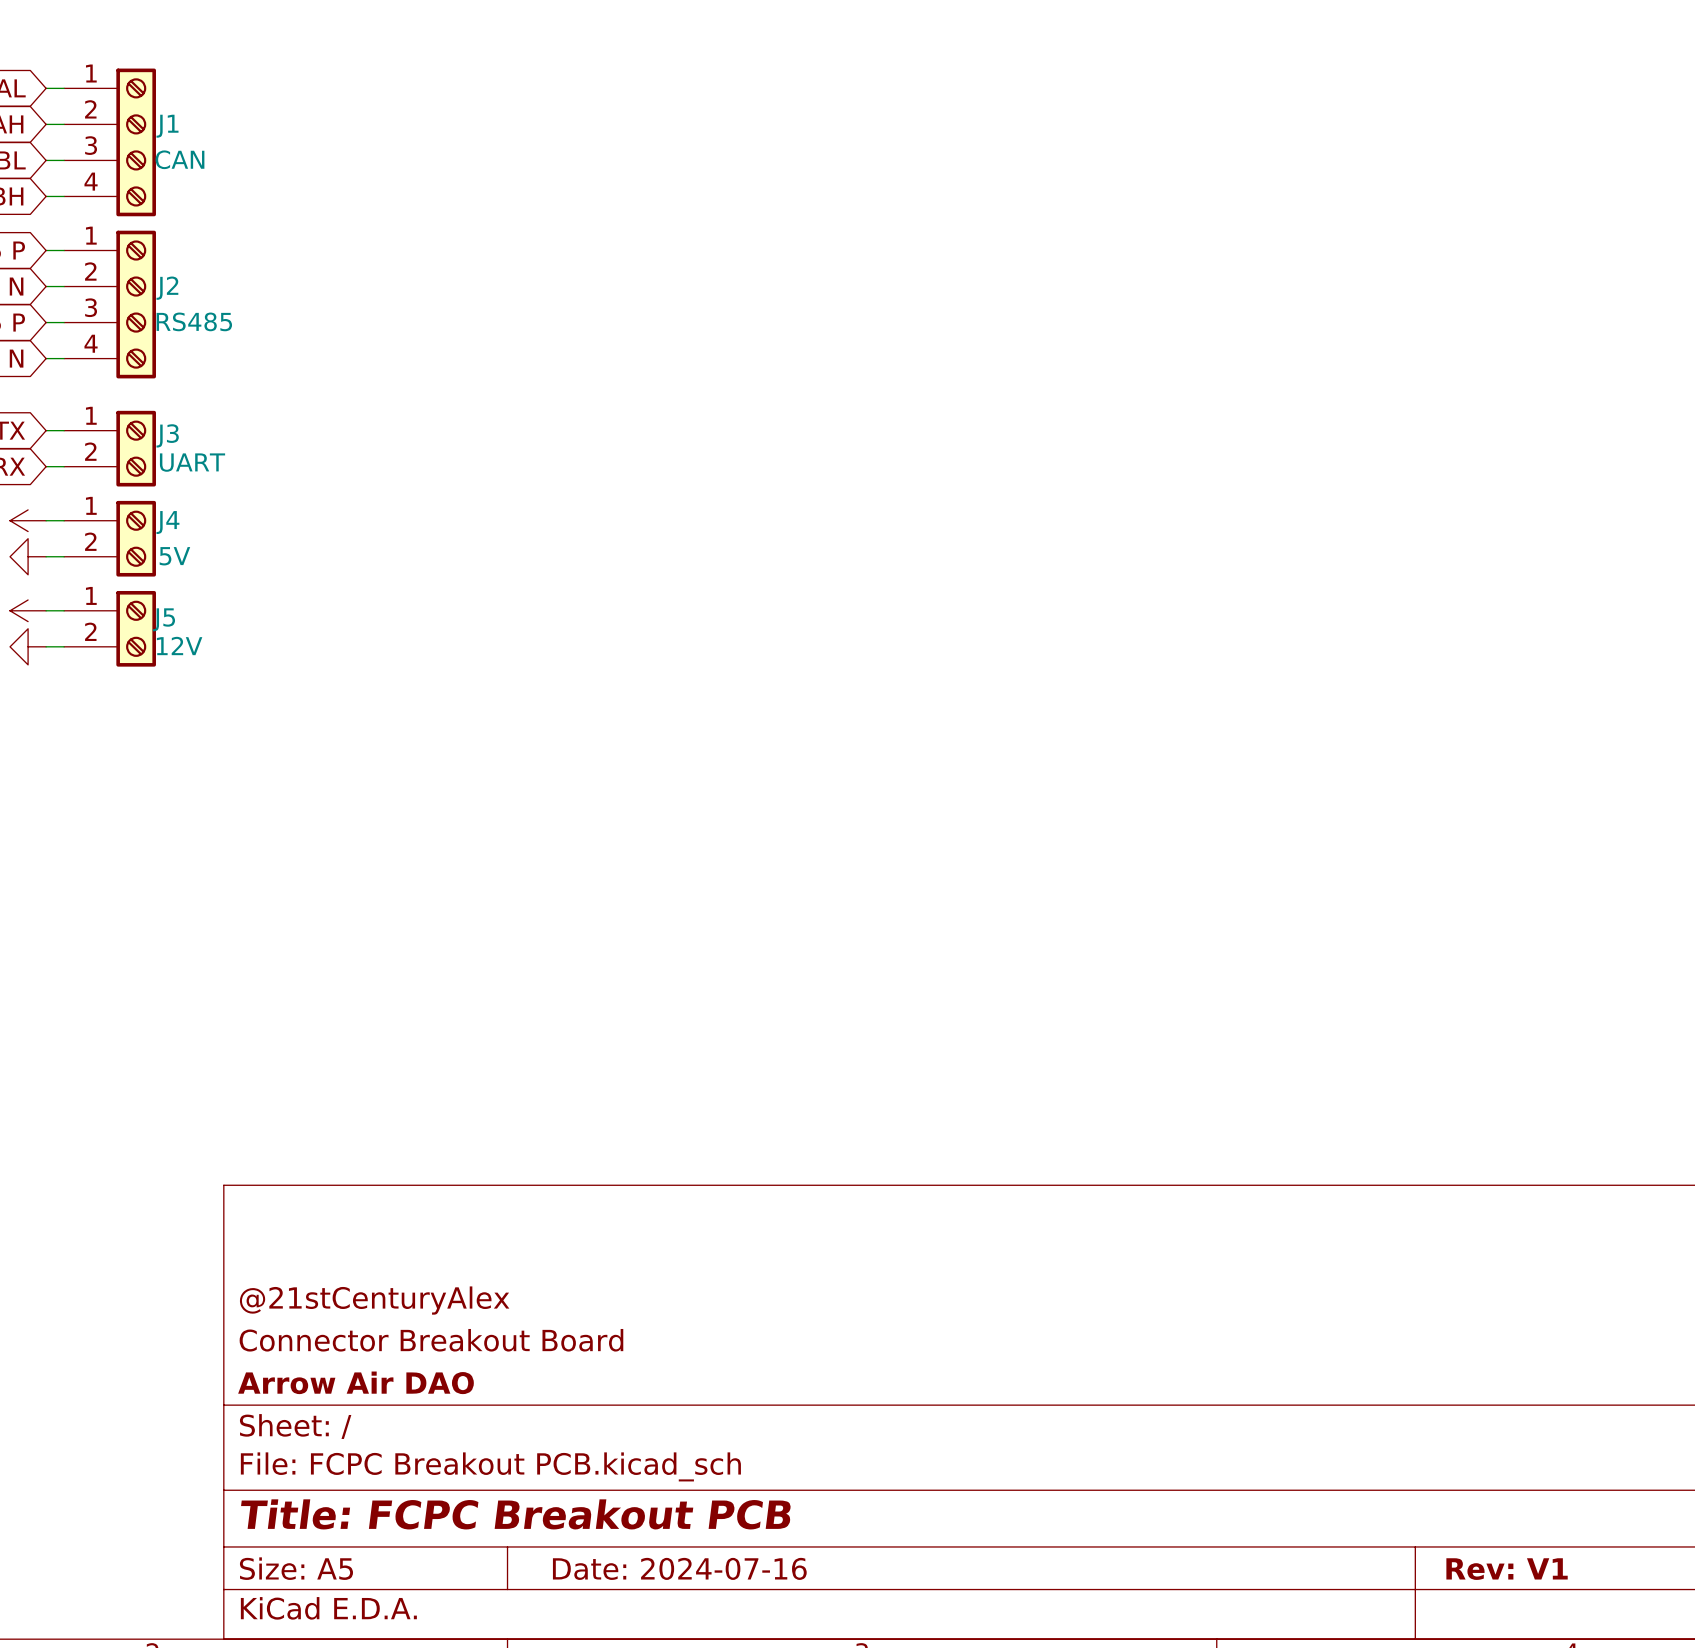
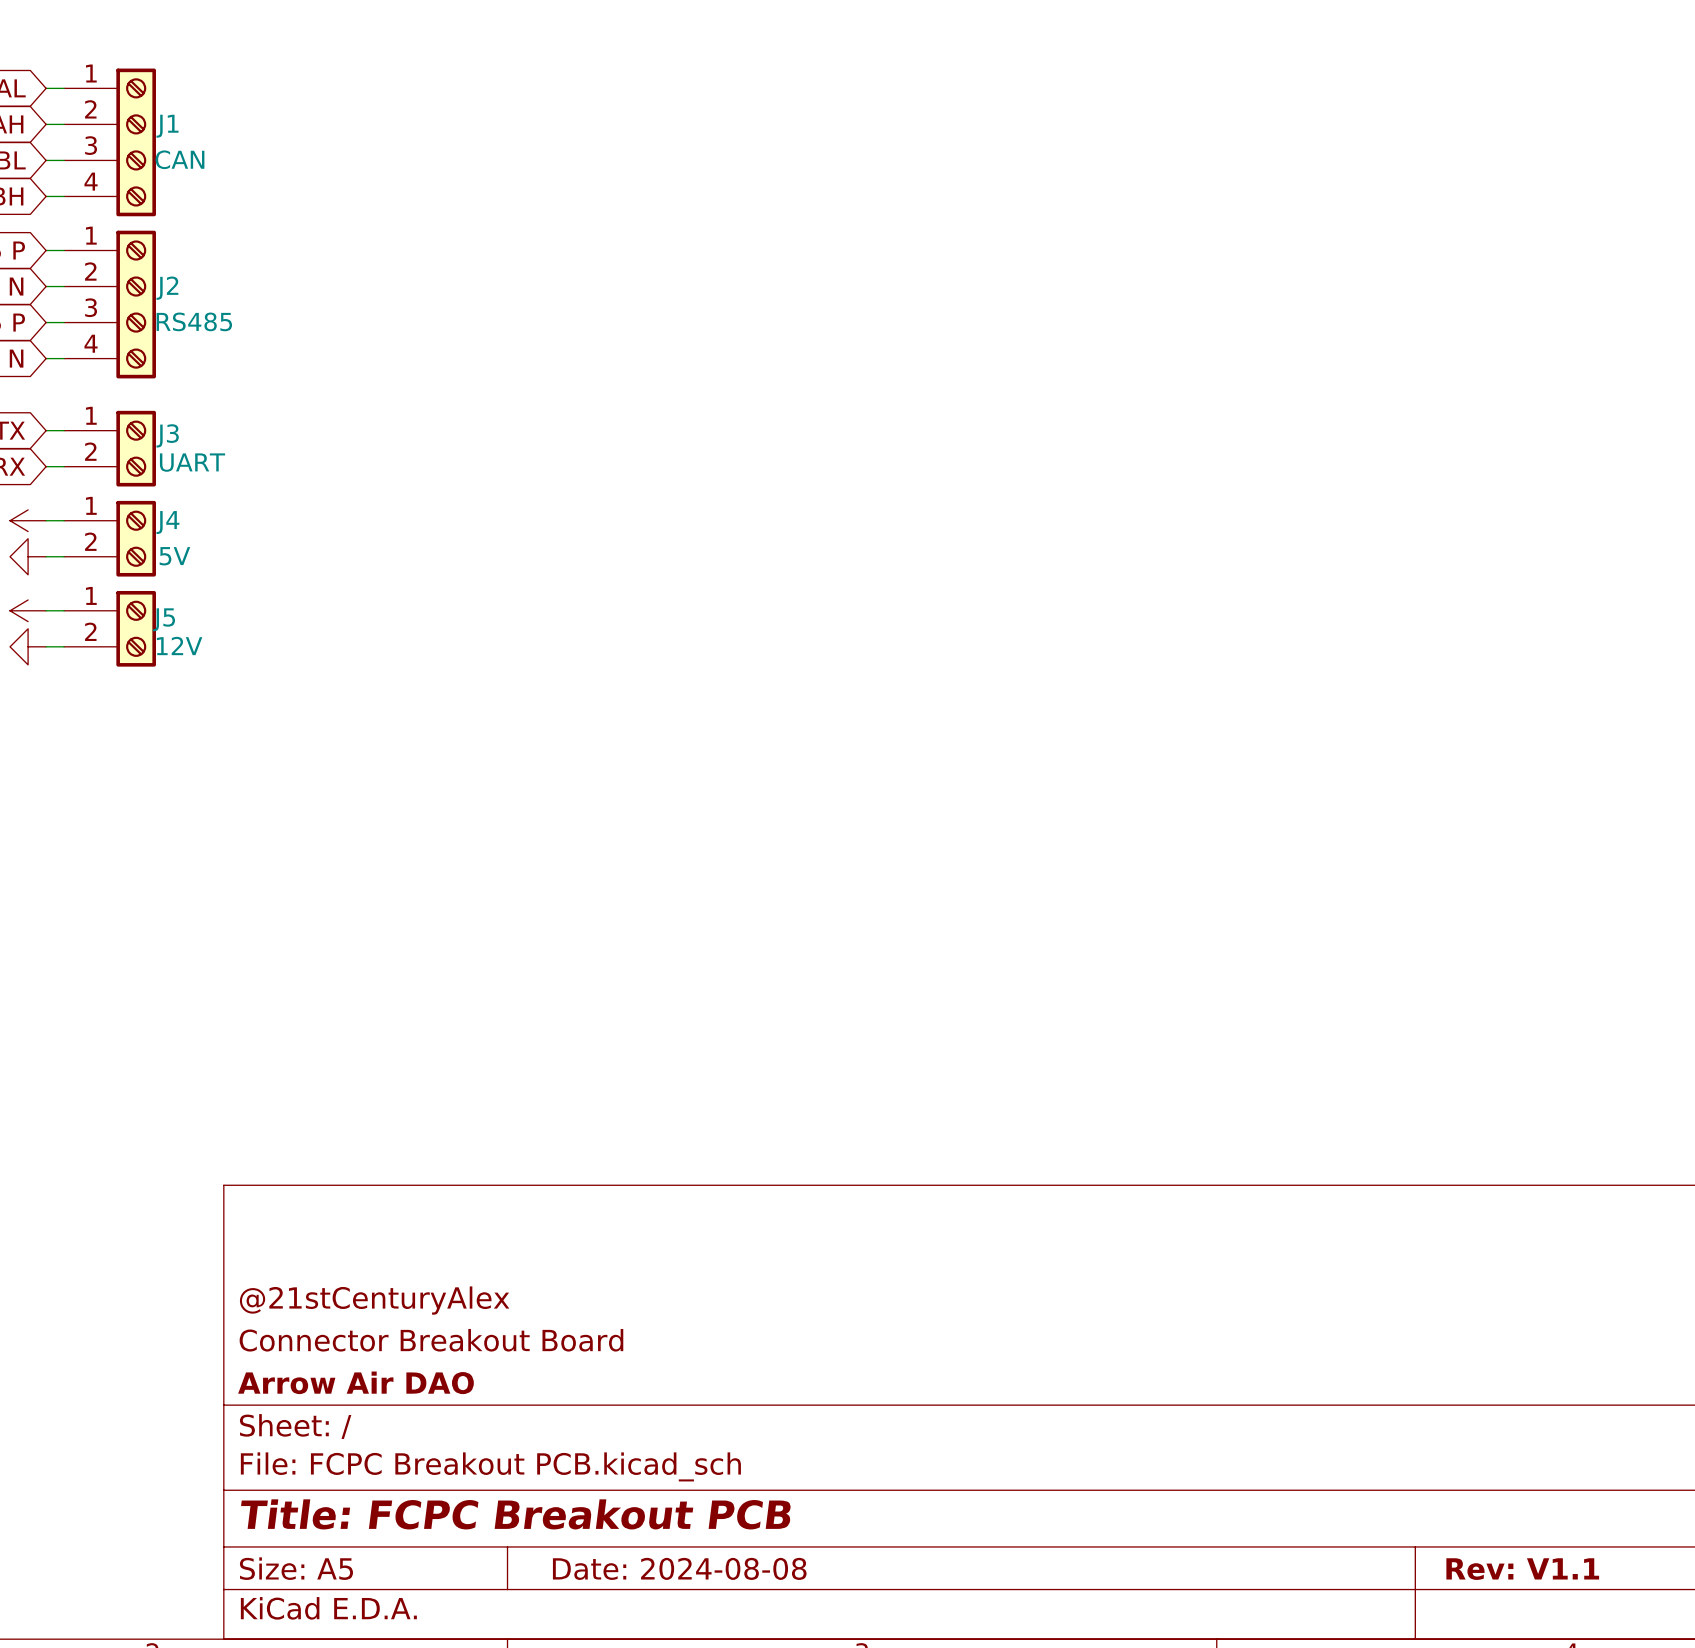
title block: Date: 2024-07-16 (679, 1568) -> Date: 2024-08-08 (679, 1568)
title block: Rev: V1 (1507, 1569) -> Rev: V1.1 (1522, 1569)

